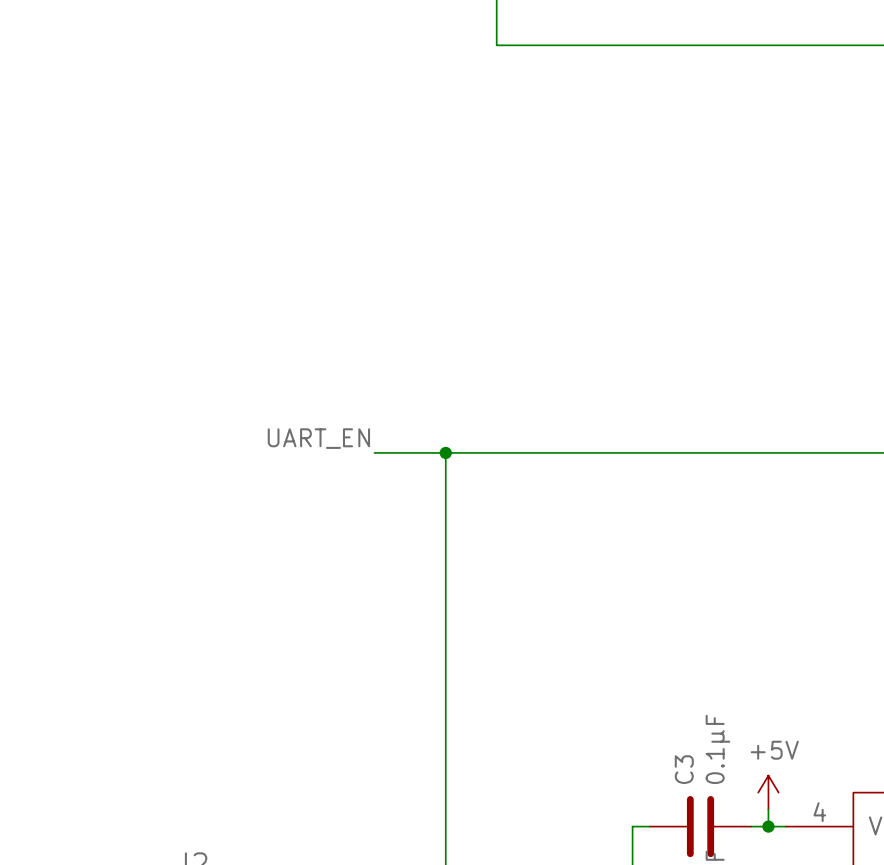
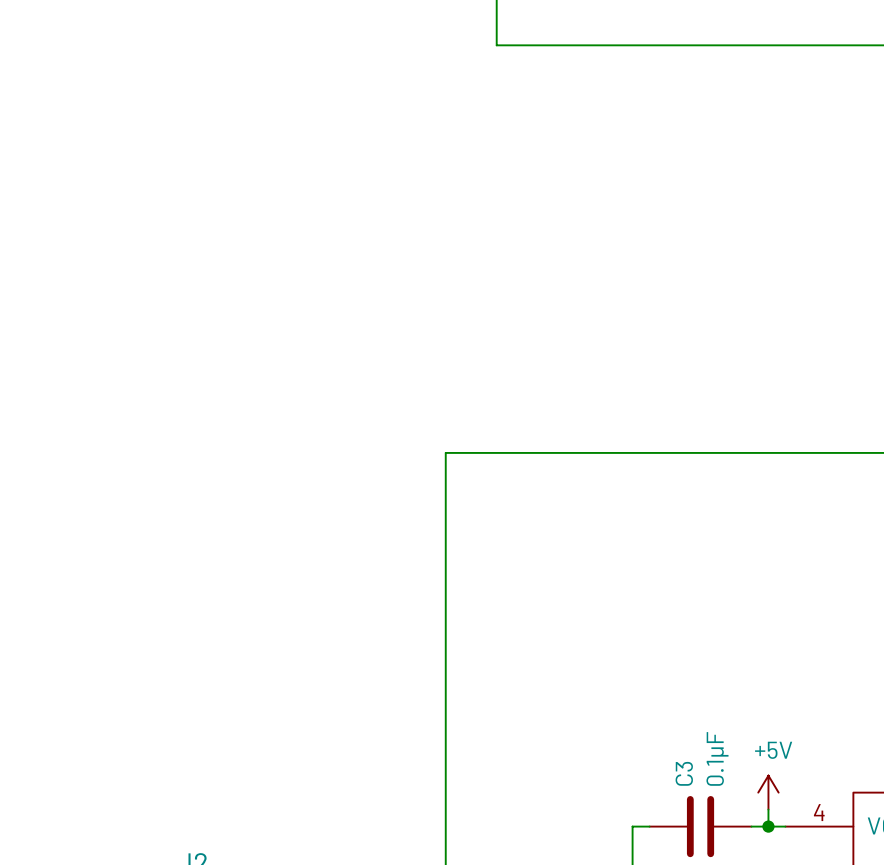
label: UART_EN (318, 438) -> none
wire: (374, 452) (445, 452) -> none
junction: (445, 452) -> none

